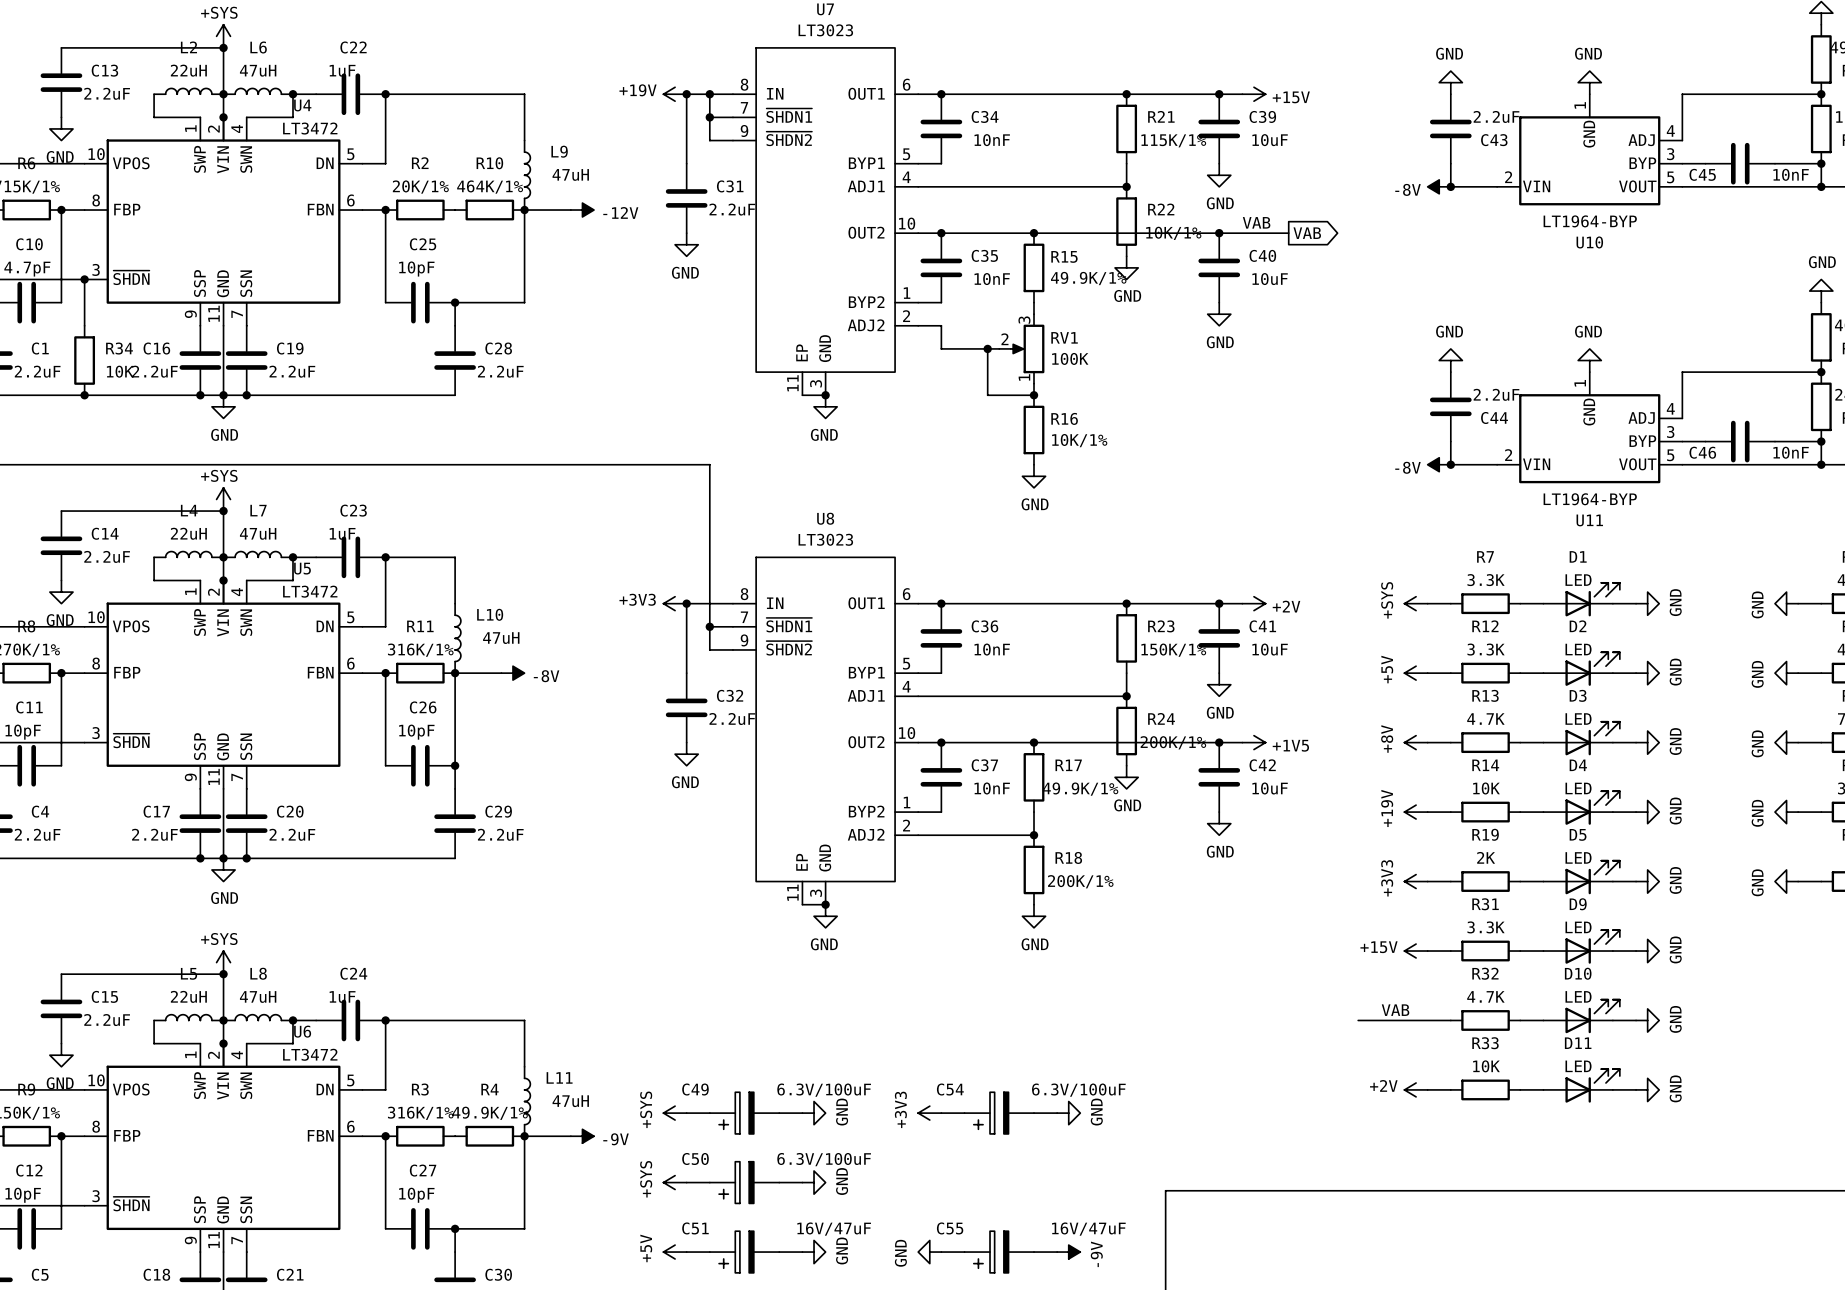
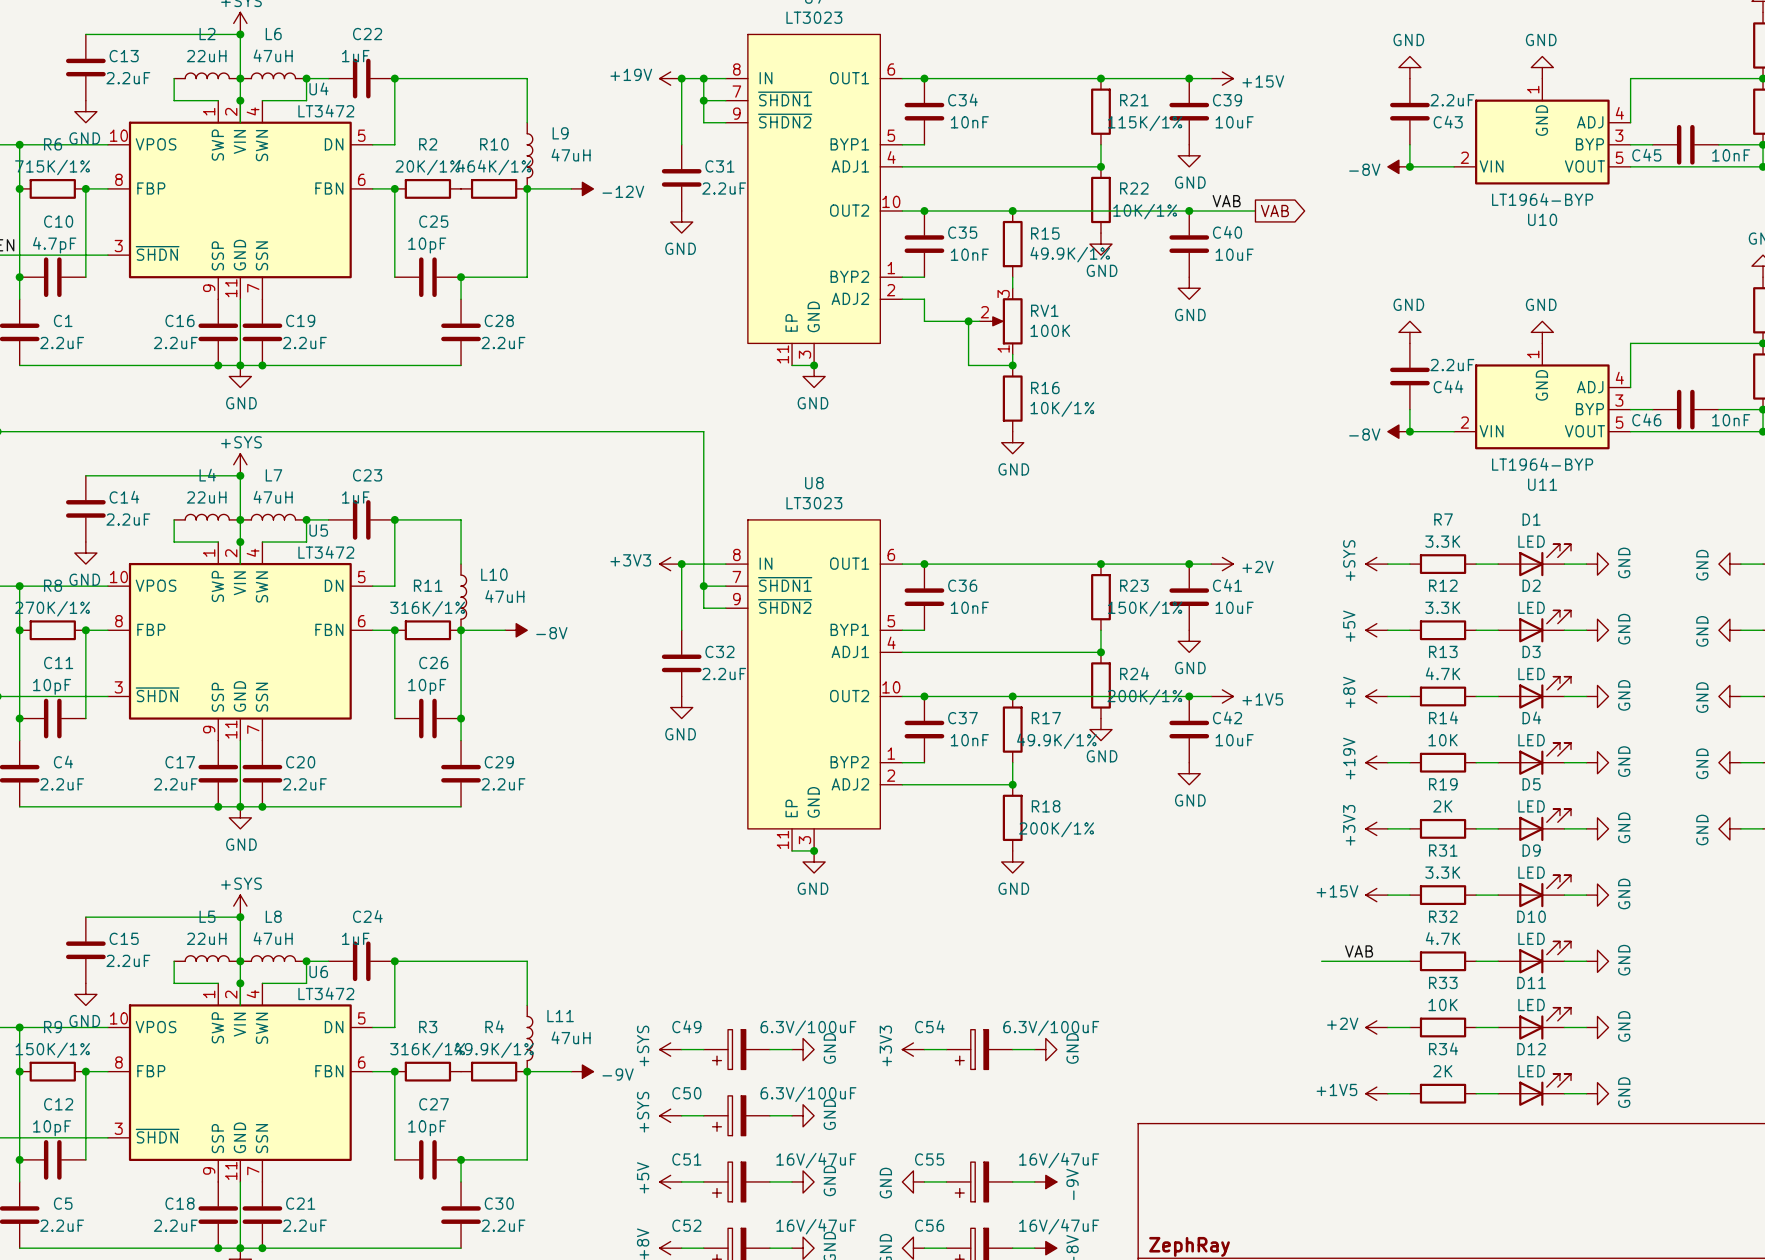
wire: (84, 279) (84, 325) -> none
junction: (84, 279) -> none
R34 name position: R34 (119, 348) -> R34 (1443, 1048)
R34 rotation: 0° (84, 360) -> 90° clockwise (1443, 1093)
R34 position: (84, 360) -> (1443, 1093)
R34 value: 10K (120, 371) -> 2K (1442, 1071)
junction: (84, 395) -> none
D12: none -> LED (1534, 1089)
power symbol: none -> +1V5 (1376, 1093)
wire: none -> (1387, 1093) (1409, 1093)
wire: none -> (1476, 1093) (1498, 1093)
wire: none -> (1564, 1093) (1586, 1093)
power symbol: none -> GND (1597, 1093)

